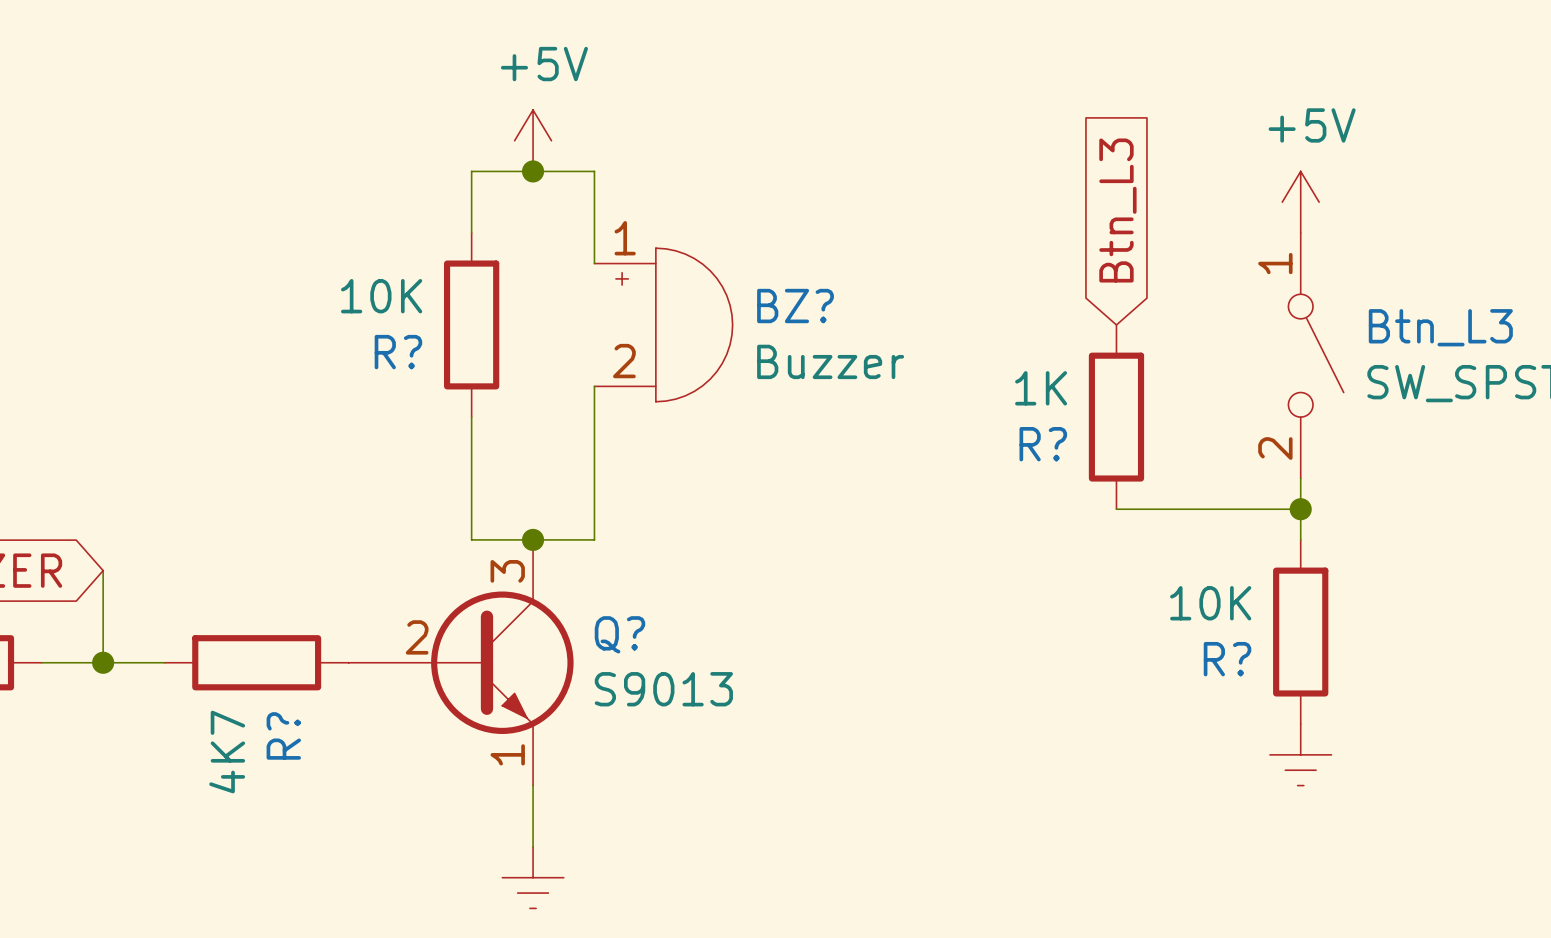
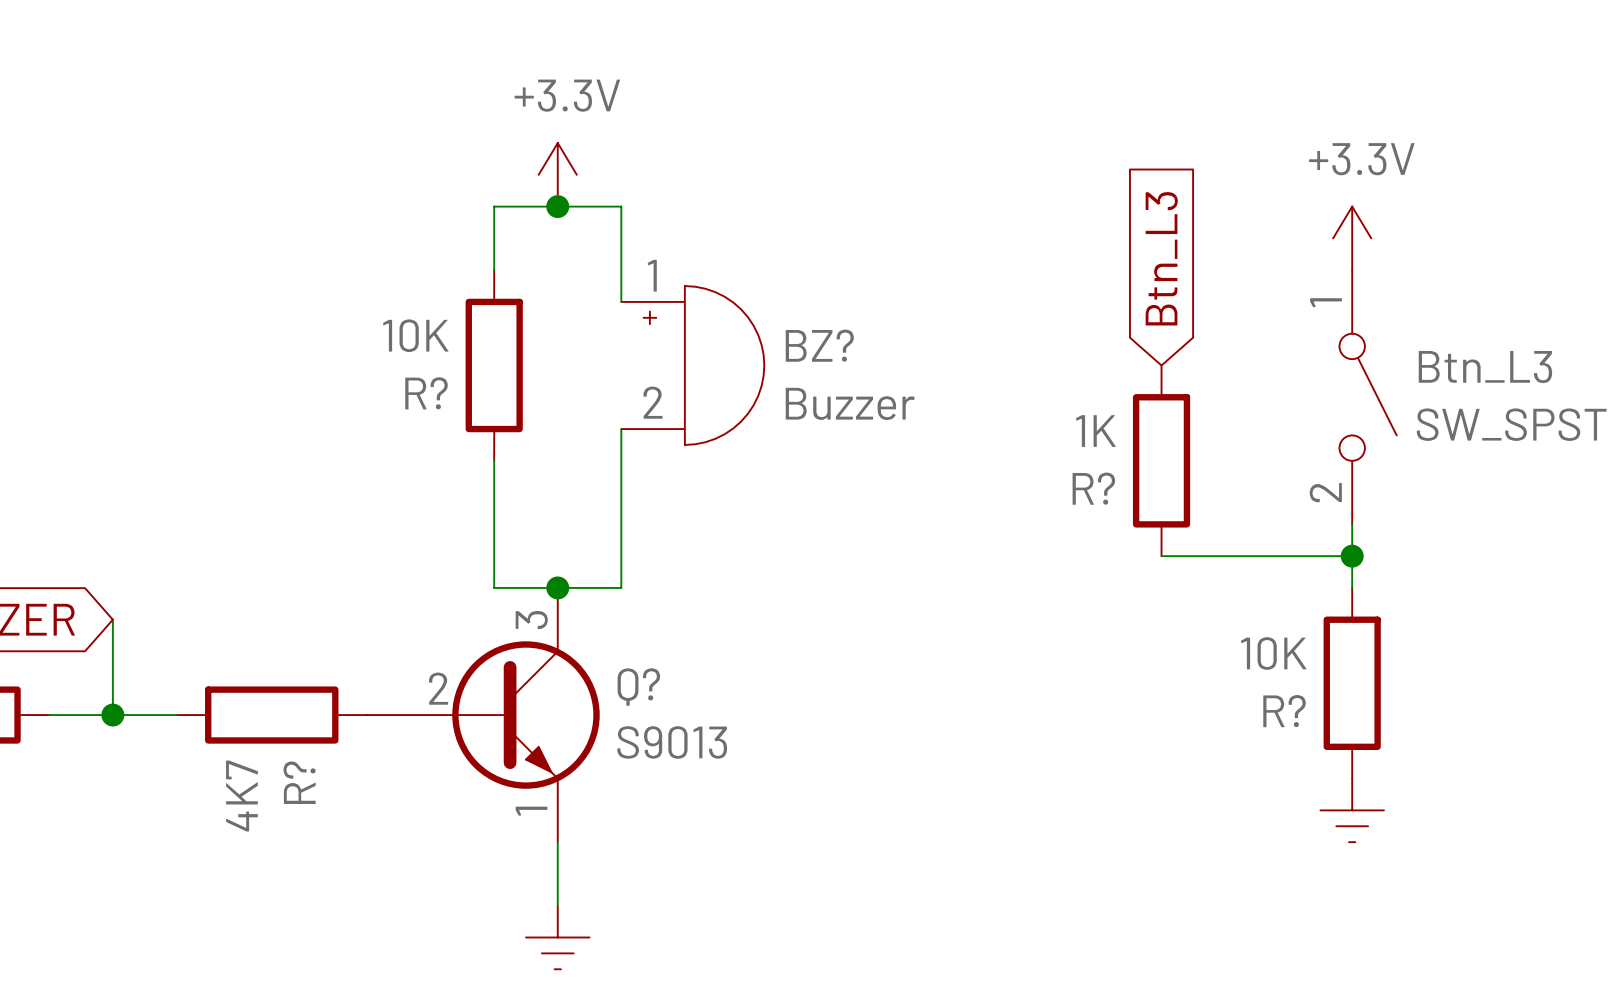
power symbol: +5V (533, 140) -> +3.3V (557, 174)
power symbol: +5V (1300, 202) -> +3.3V (1352, 238)

